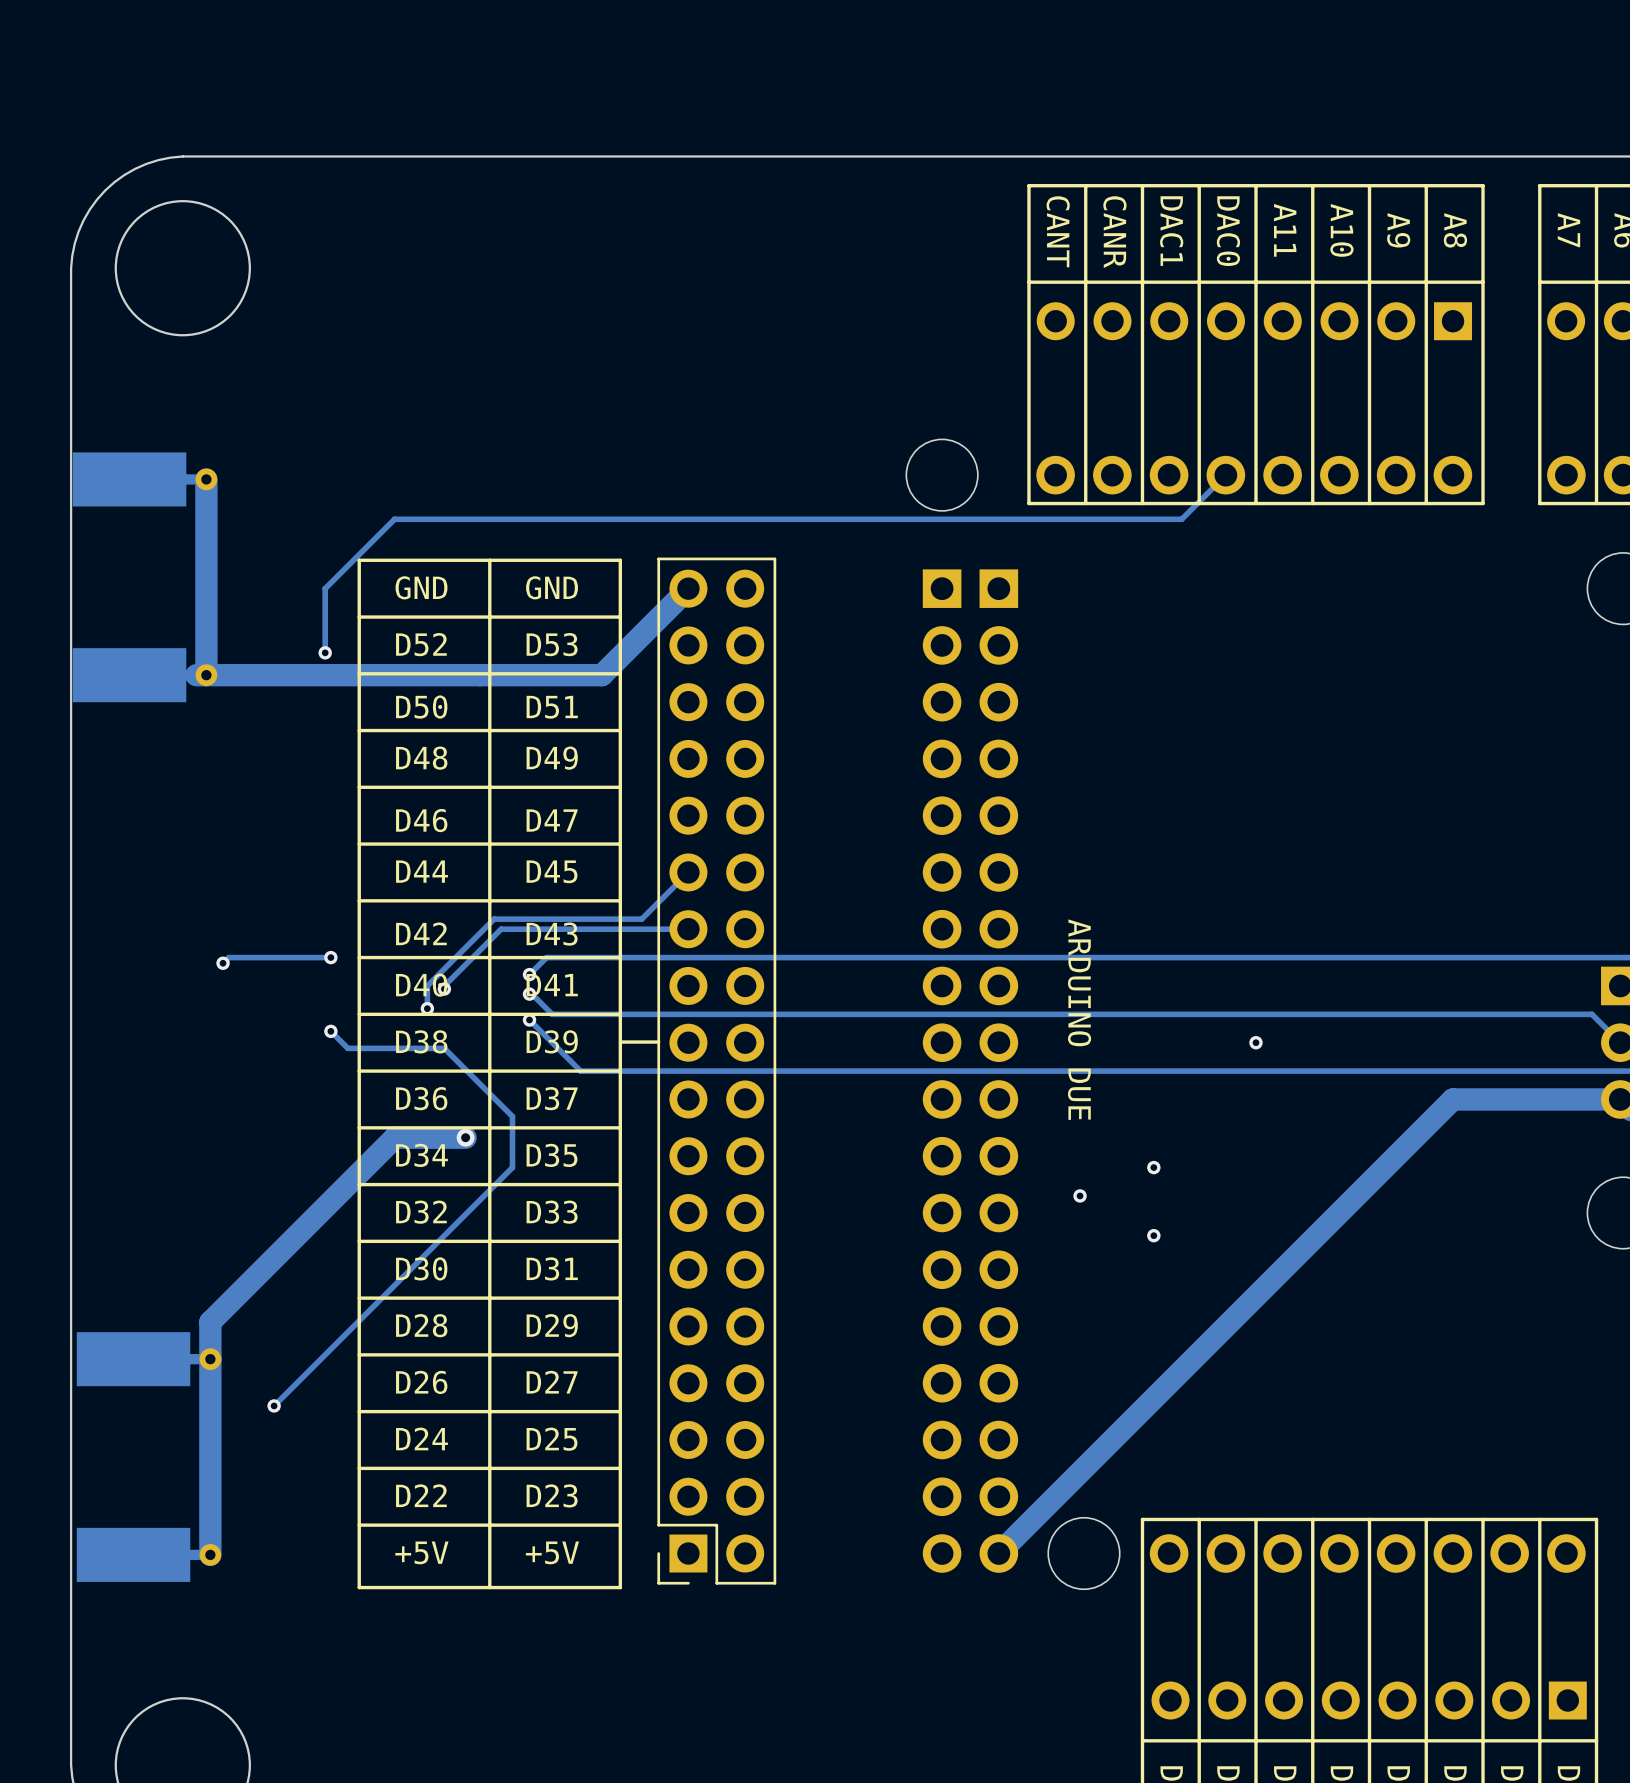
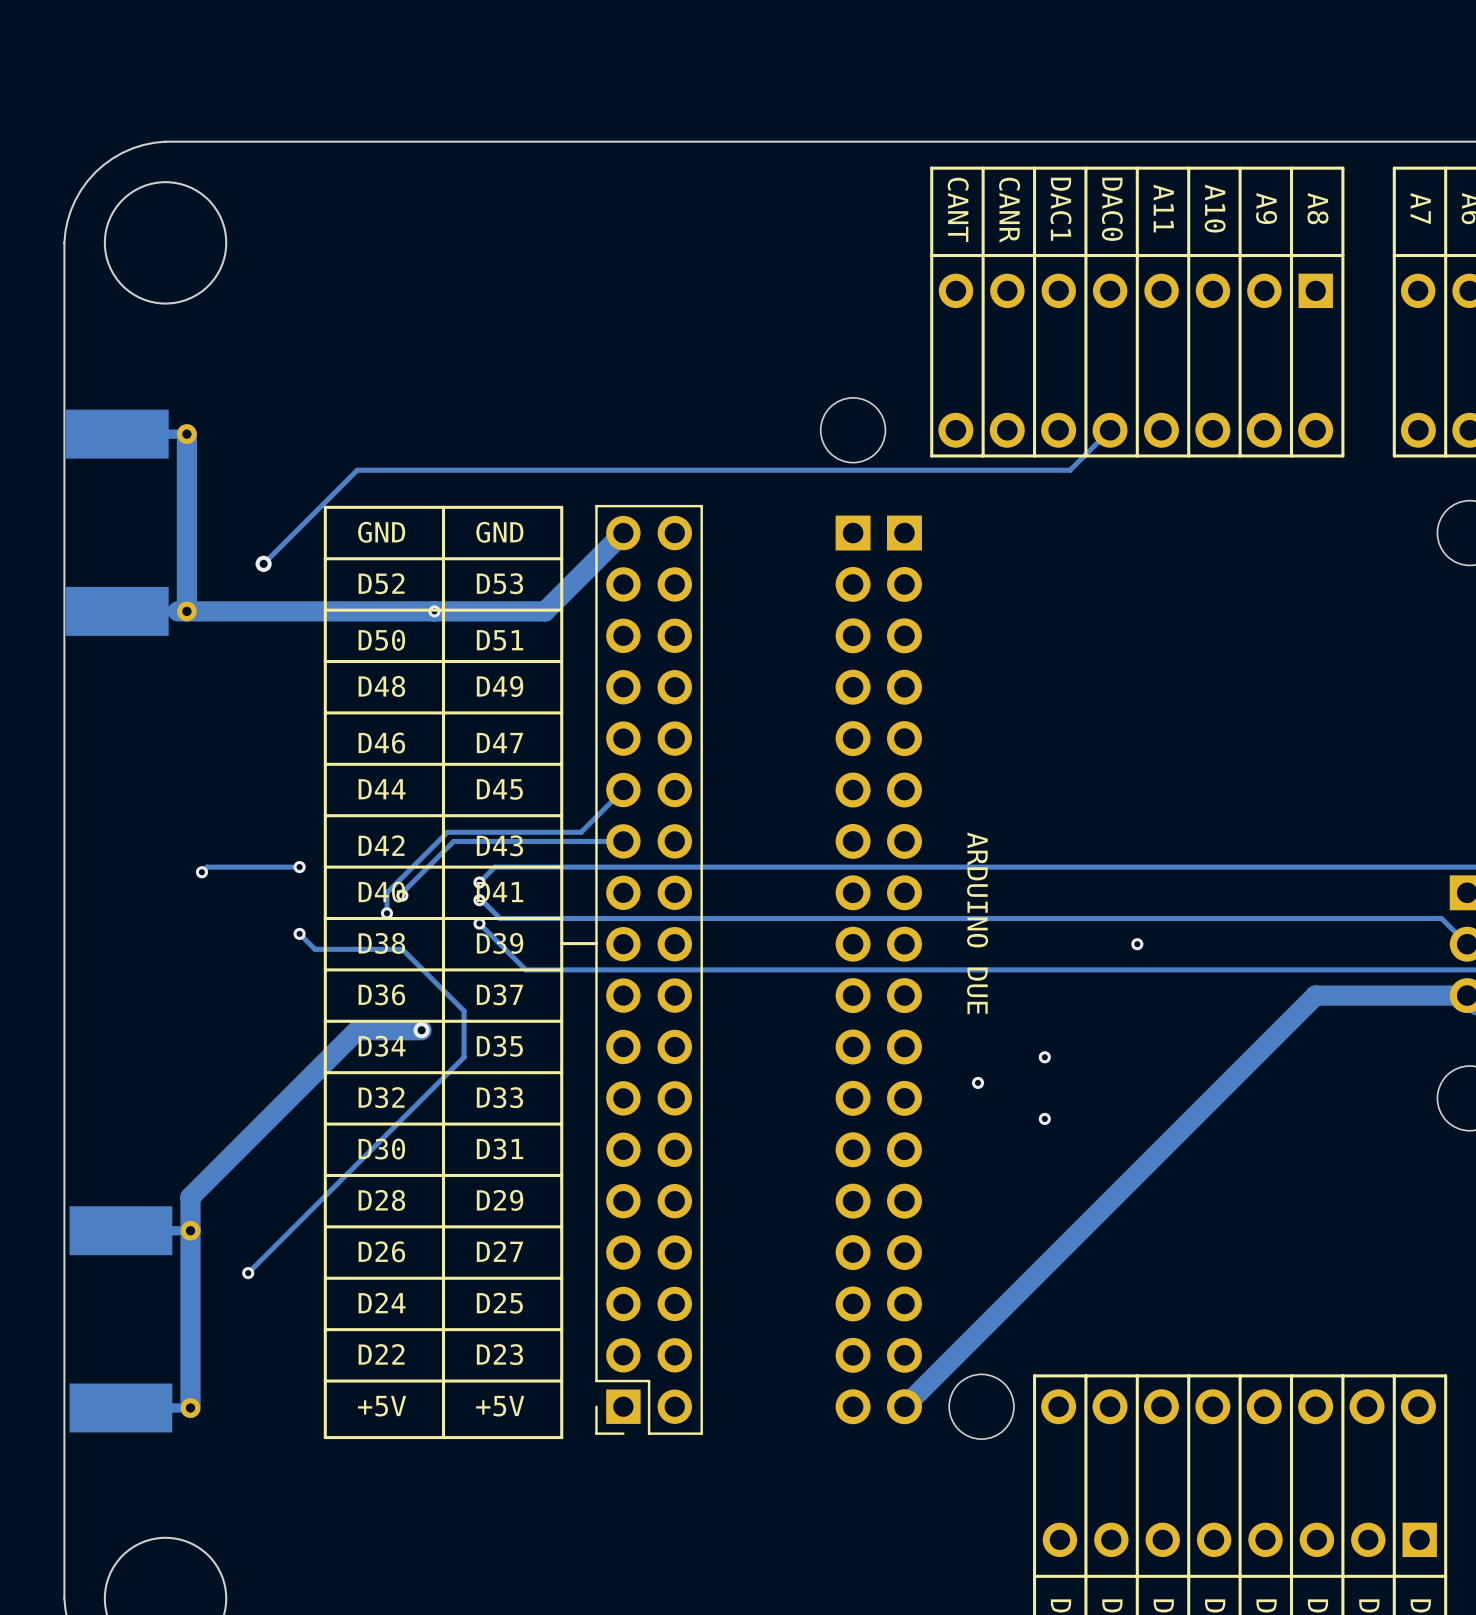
track: (325, 588) (325, 652) -> (294, 533) (263, 563)
via: none -> (263, 563)
via: (325, 652) -> none
via: none -> (434, 611)

